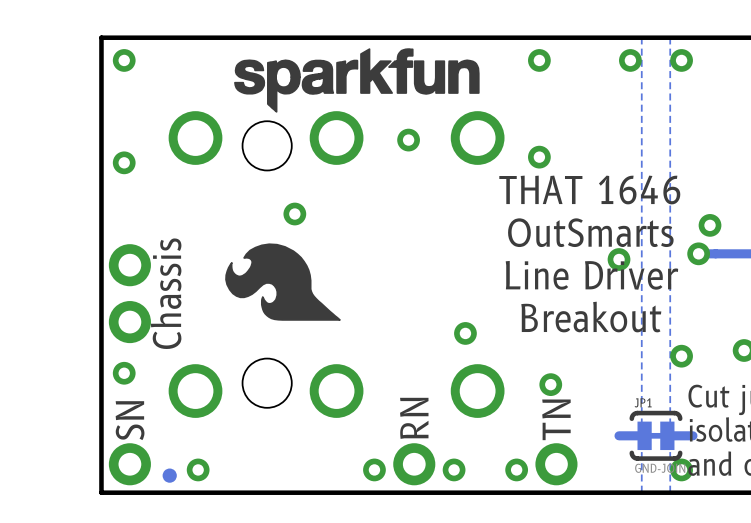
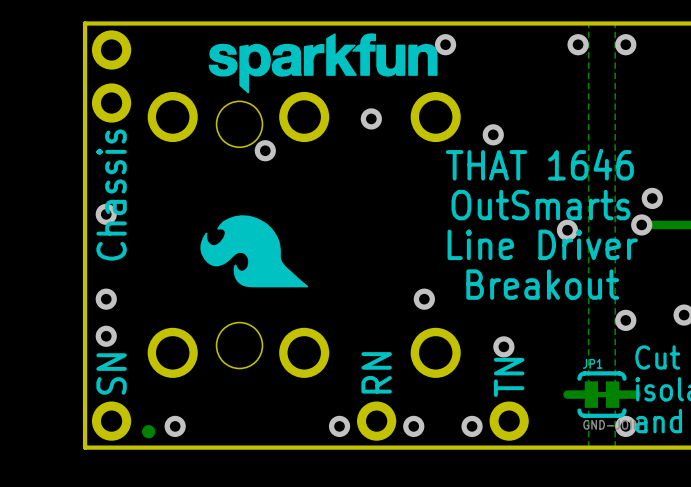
via: (124, 60) -> none
via position: (539, 60) -> (445, 44)
via position: (124, 162) -> (106, 214)
via position: (294, 214) -> (265, 150)
part position: (129, 293) -> (111, 76)
text position: Chassis (166, 293) -> Chassis (111, 195)
via: none -> (106, 299)

